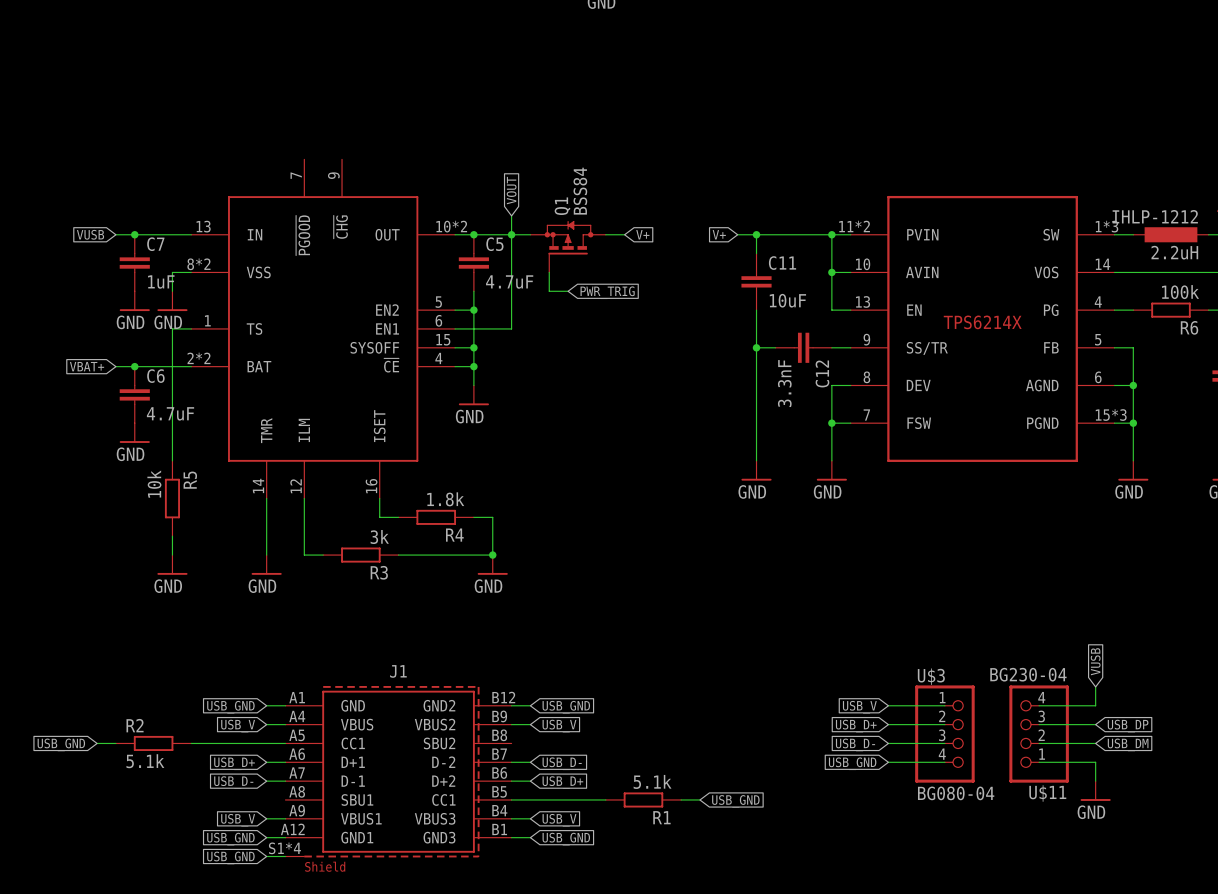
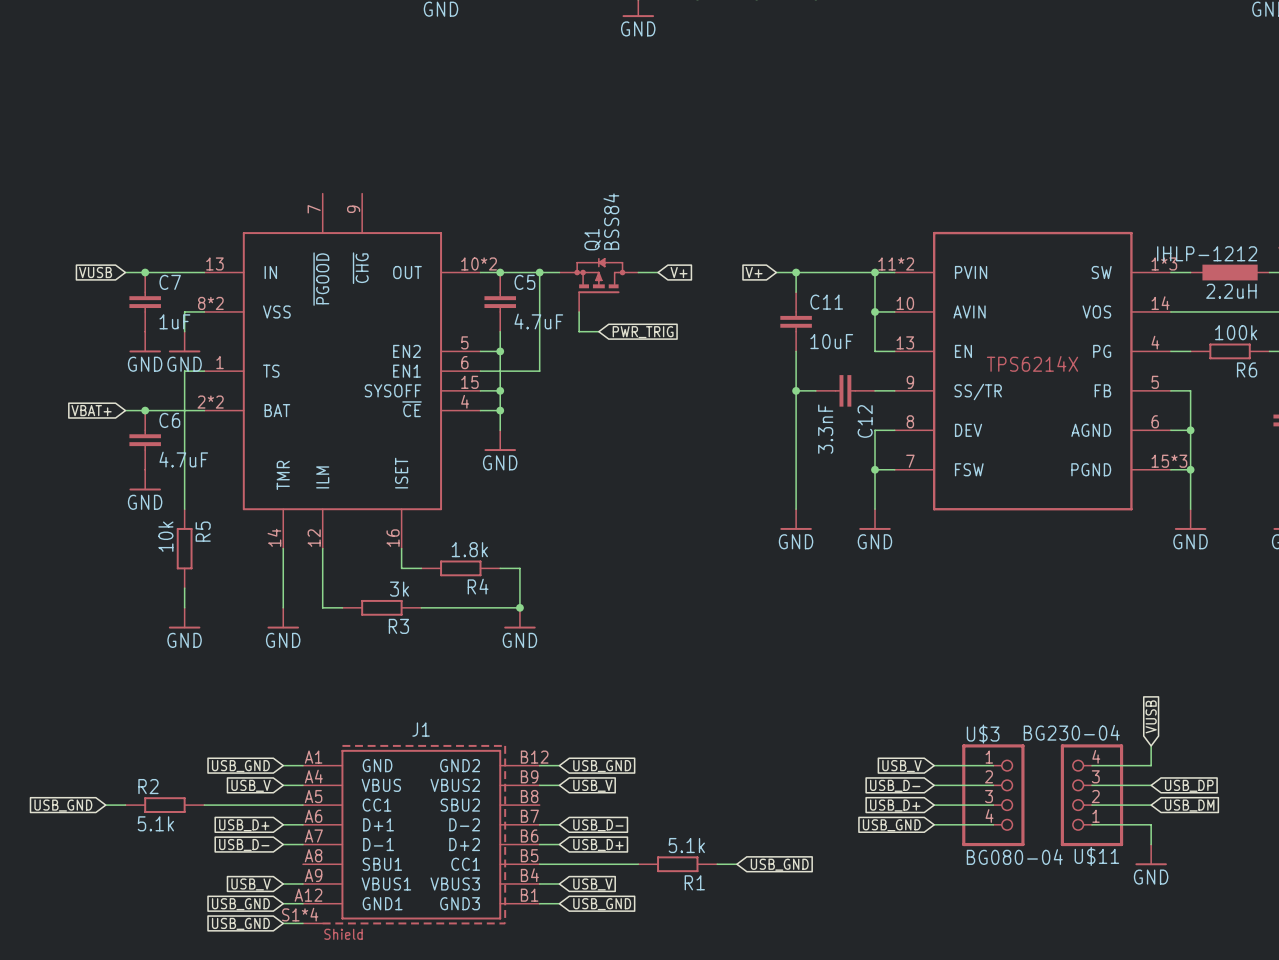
global label: VOUT (511, 190) -> none
wire: (511, 215) (511, 234) -> none
global label: USB_D+ (856, 726) -> USB_D- (895, 785)
global label: USB_D- (855, 744) -> USB_D+ (895, 805)

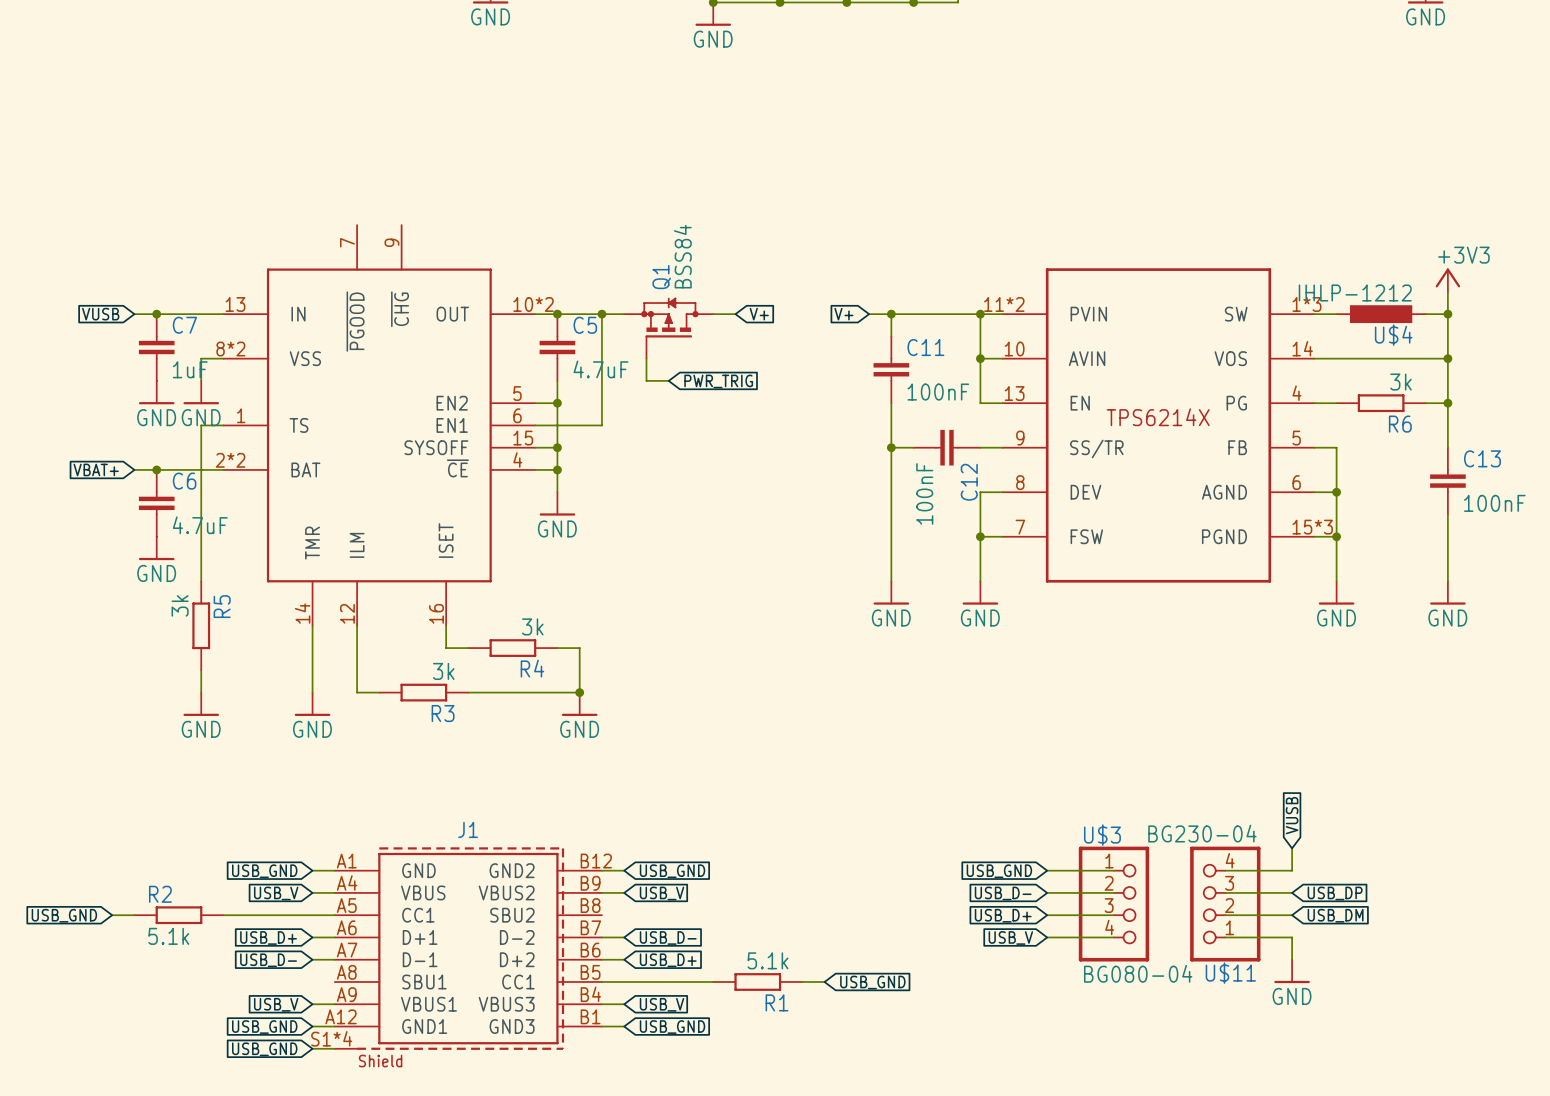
text: 2.2uH (1231, 291) -> none
U$4 name: none -> U$4 (1393, 335)
R6 value: 100k (1236, 332) -> 3k (1401, 382)
C11 value: 10uF (831, 341) -> 100nF (938, 392)
C12 value: 3.3nF (825, 429) -> 100nF (924, 493)
R5 value: 10k (165, 536) -> 3k (180, 605)
R4 value: 1.8k (469, 549) -> 3k (532, 626)
global label: USB_V (901, 766) -> USB_GND (999, 871)
global label: USB_GND (891, 825) -> USB_V (1010, 938)

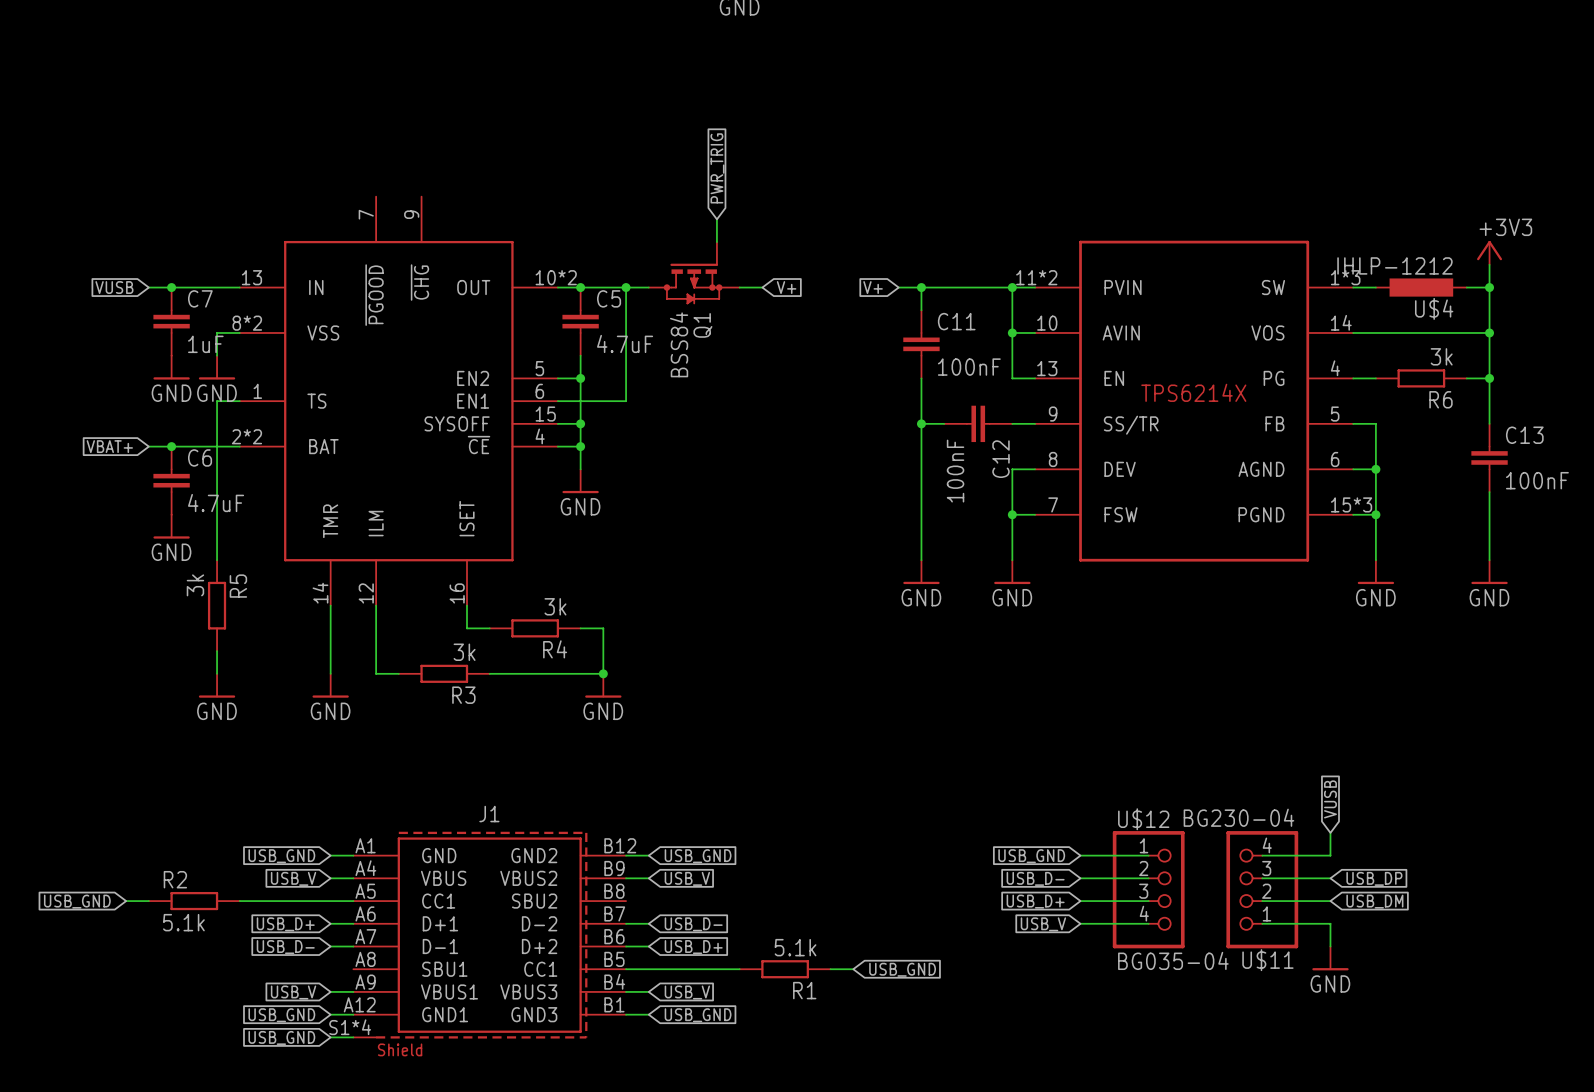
wire: none -> (716, 219) (716, 242)
Q1 rotation: 0° (669, 317) -> 180° (693, 283)
wire: (646, 358) (646, 380) (668, 380) -> none
global label rotation: 0° (718, 381) -> 90° counterclockwise (717, 168)
global label position: PWR_TRIG (718, 381) -> PWR_TRIG (717, 168)
U$3 name: U$3 (1102, 835) -> U$12 (1143, 819)
U$3 value: BG080-04 (1138, 973) -> BG035-04 (1173, 960)

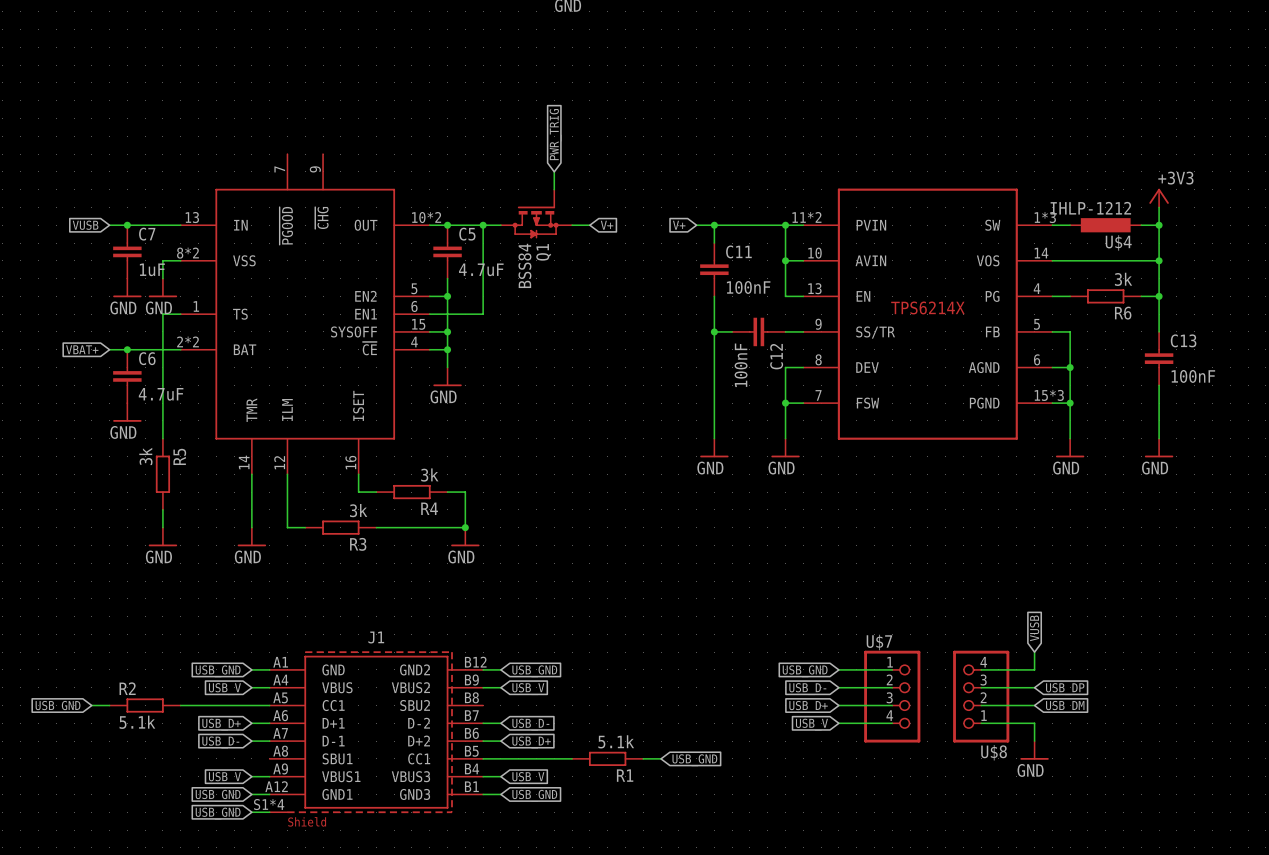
U$11 value: BG230-04 (1238, 817) -> none
U$12 name: U$12 (1143, 819) -> U$7 (879, 642)
U$12 value: BG035-04 (1173, 960) -> none
U$11 name: U$11 (1267, 960) -> U$8 (994, 752)

